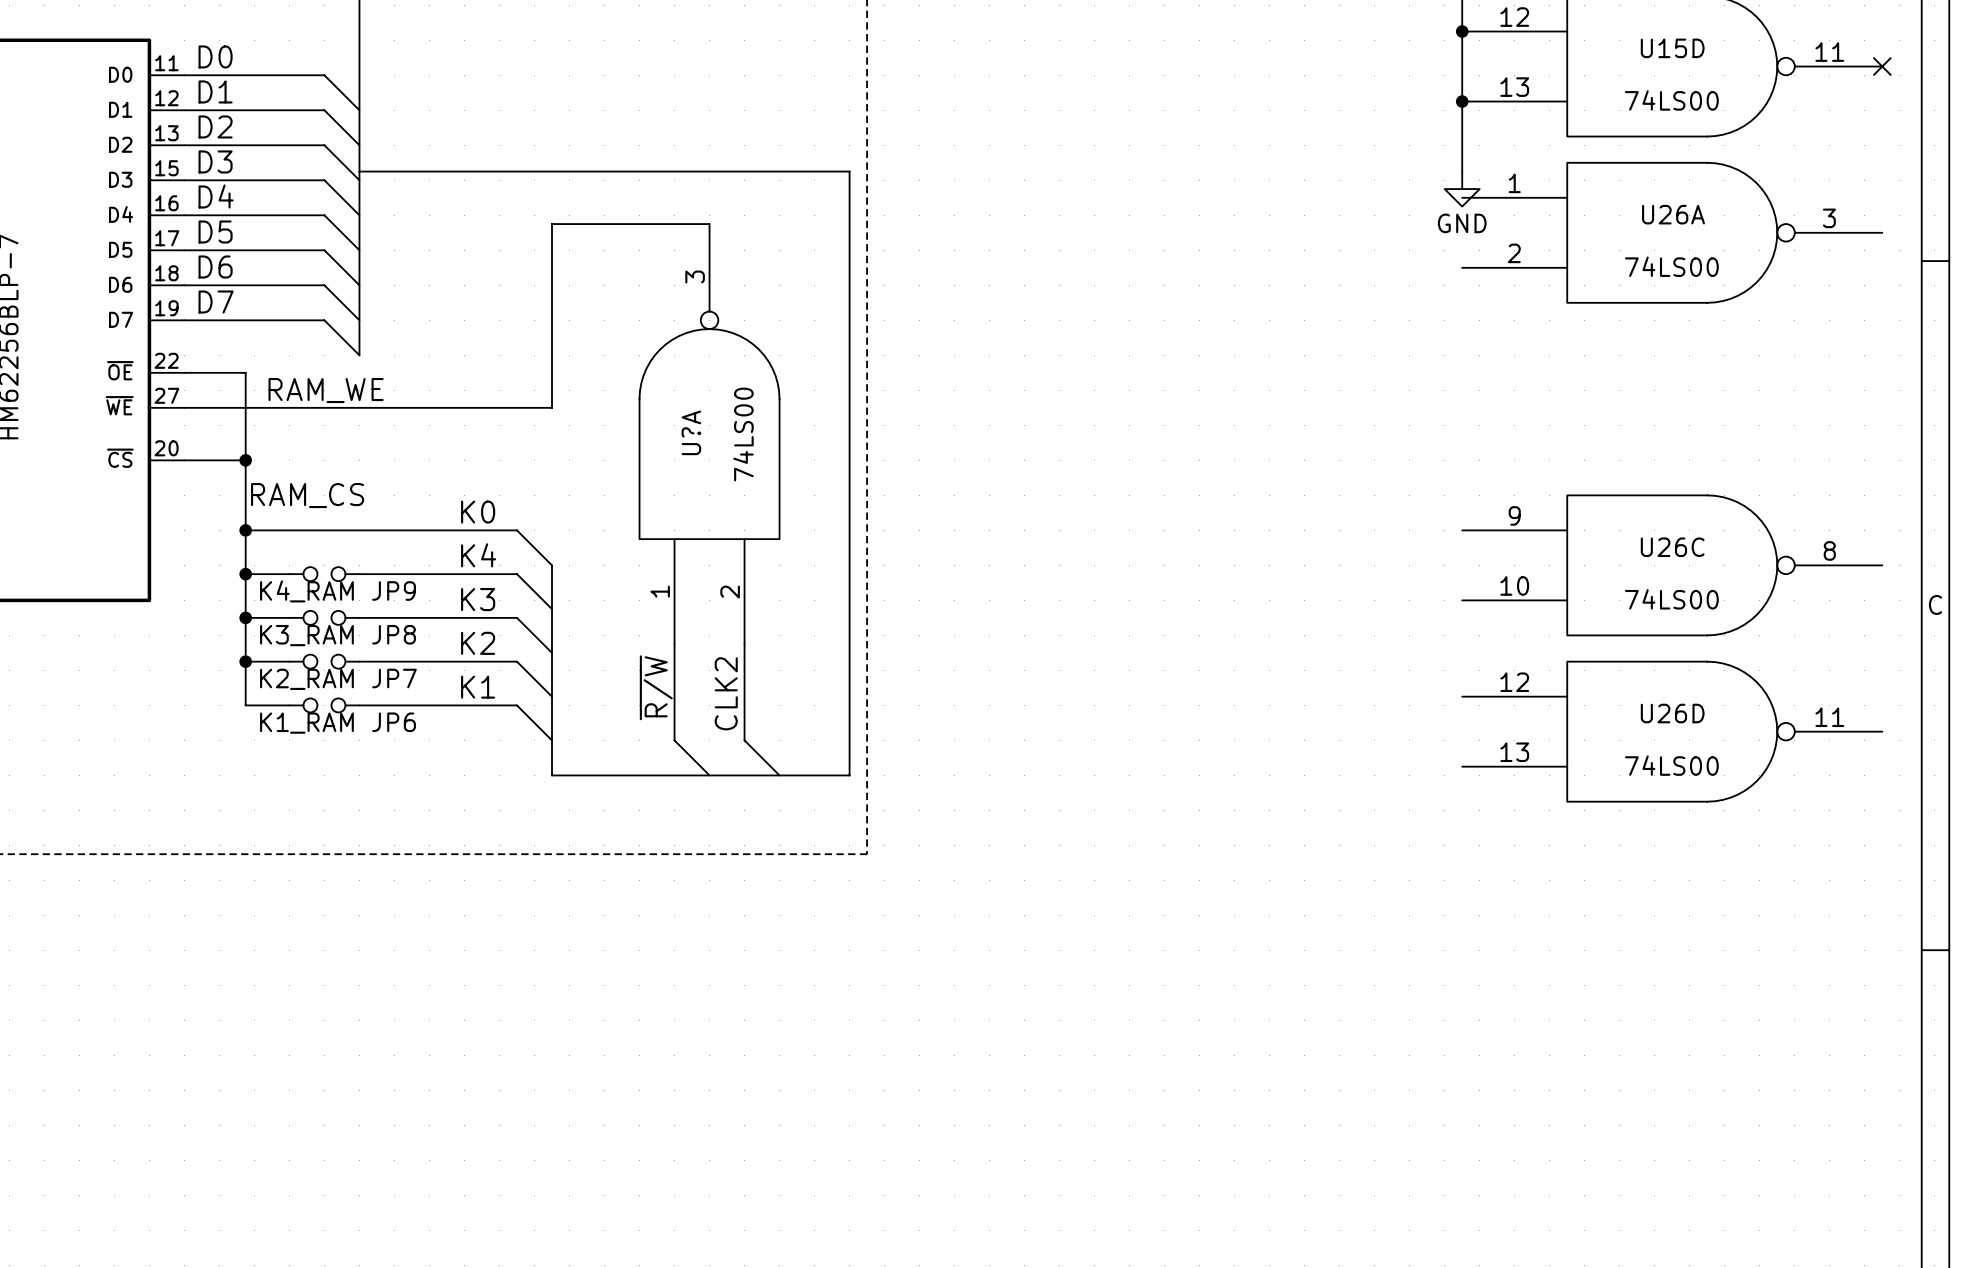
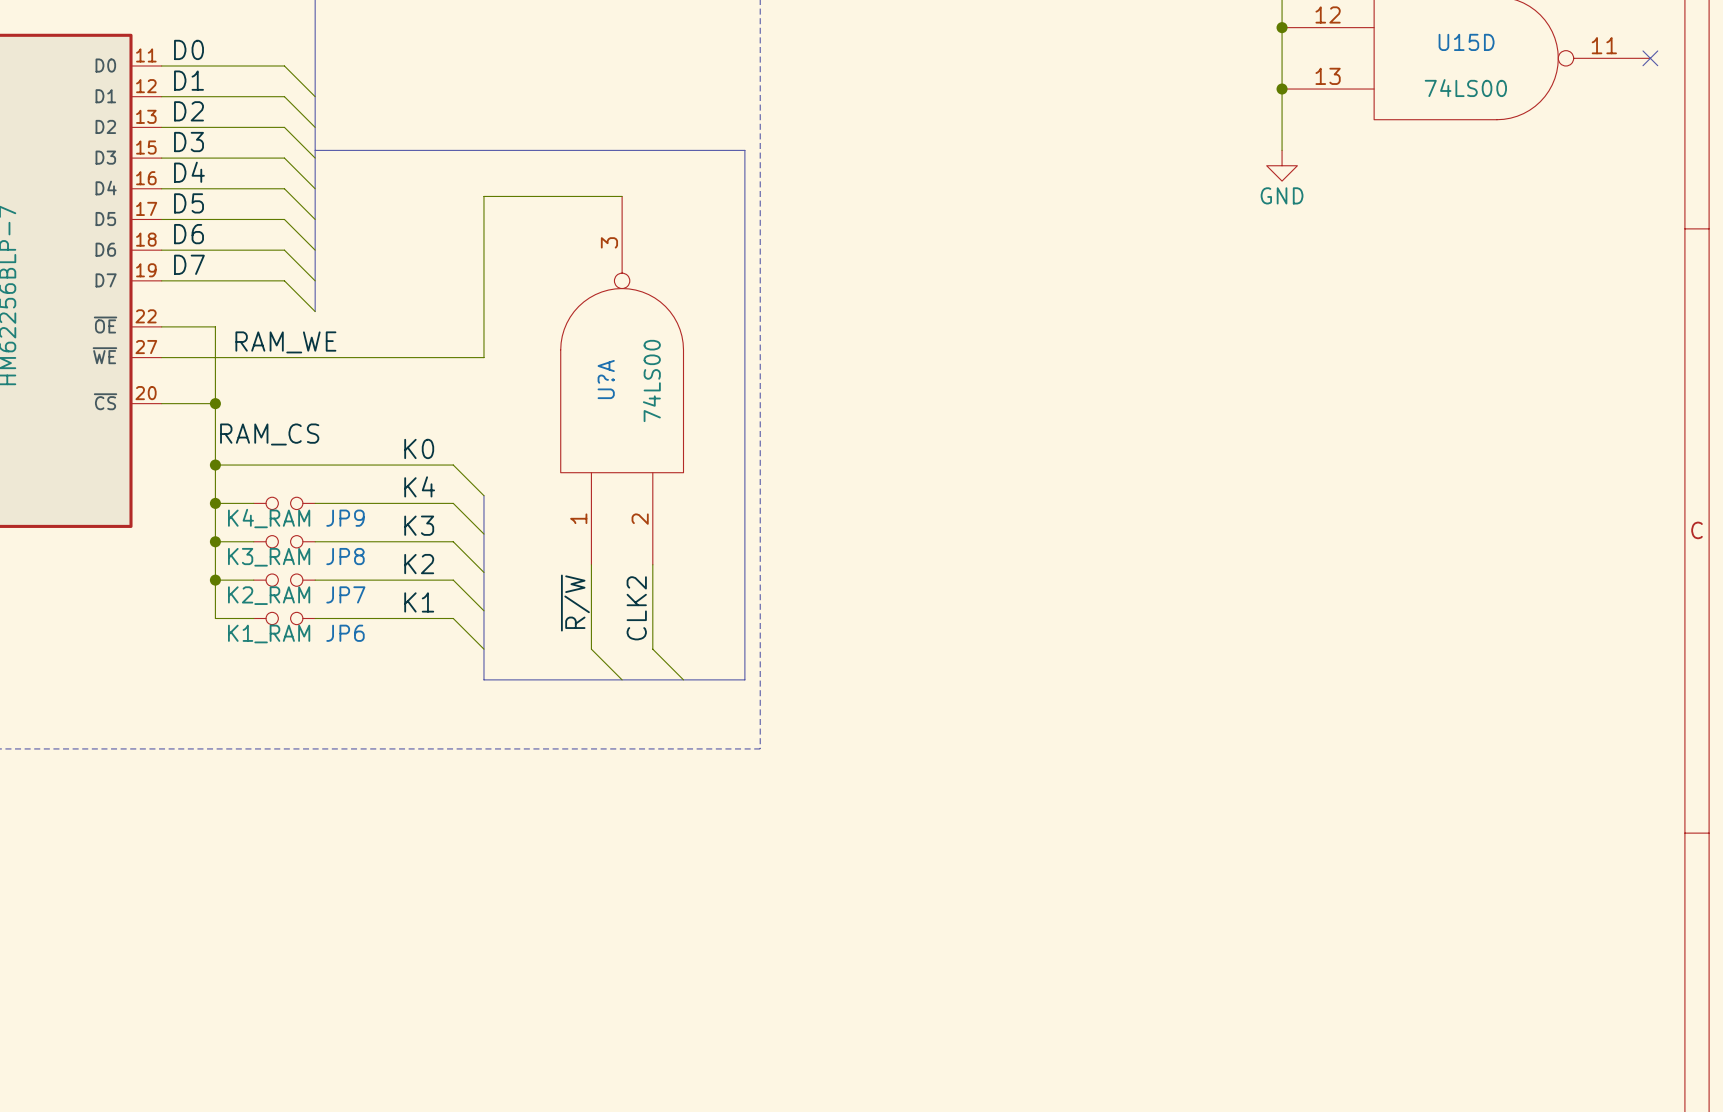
U26A: 74LS00 (1672, 232) -> none
U26C: 74LS00 (1672, 565) -> none
U26D: 74LS00 (1672, 731) -> none

